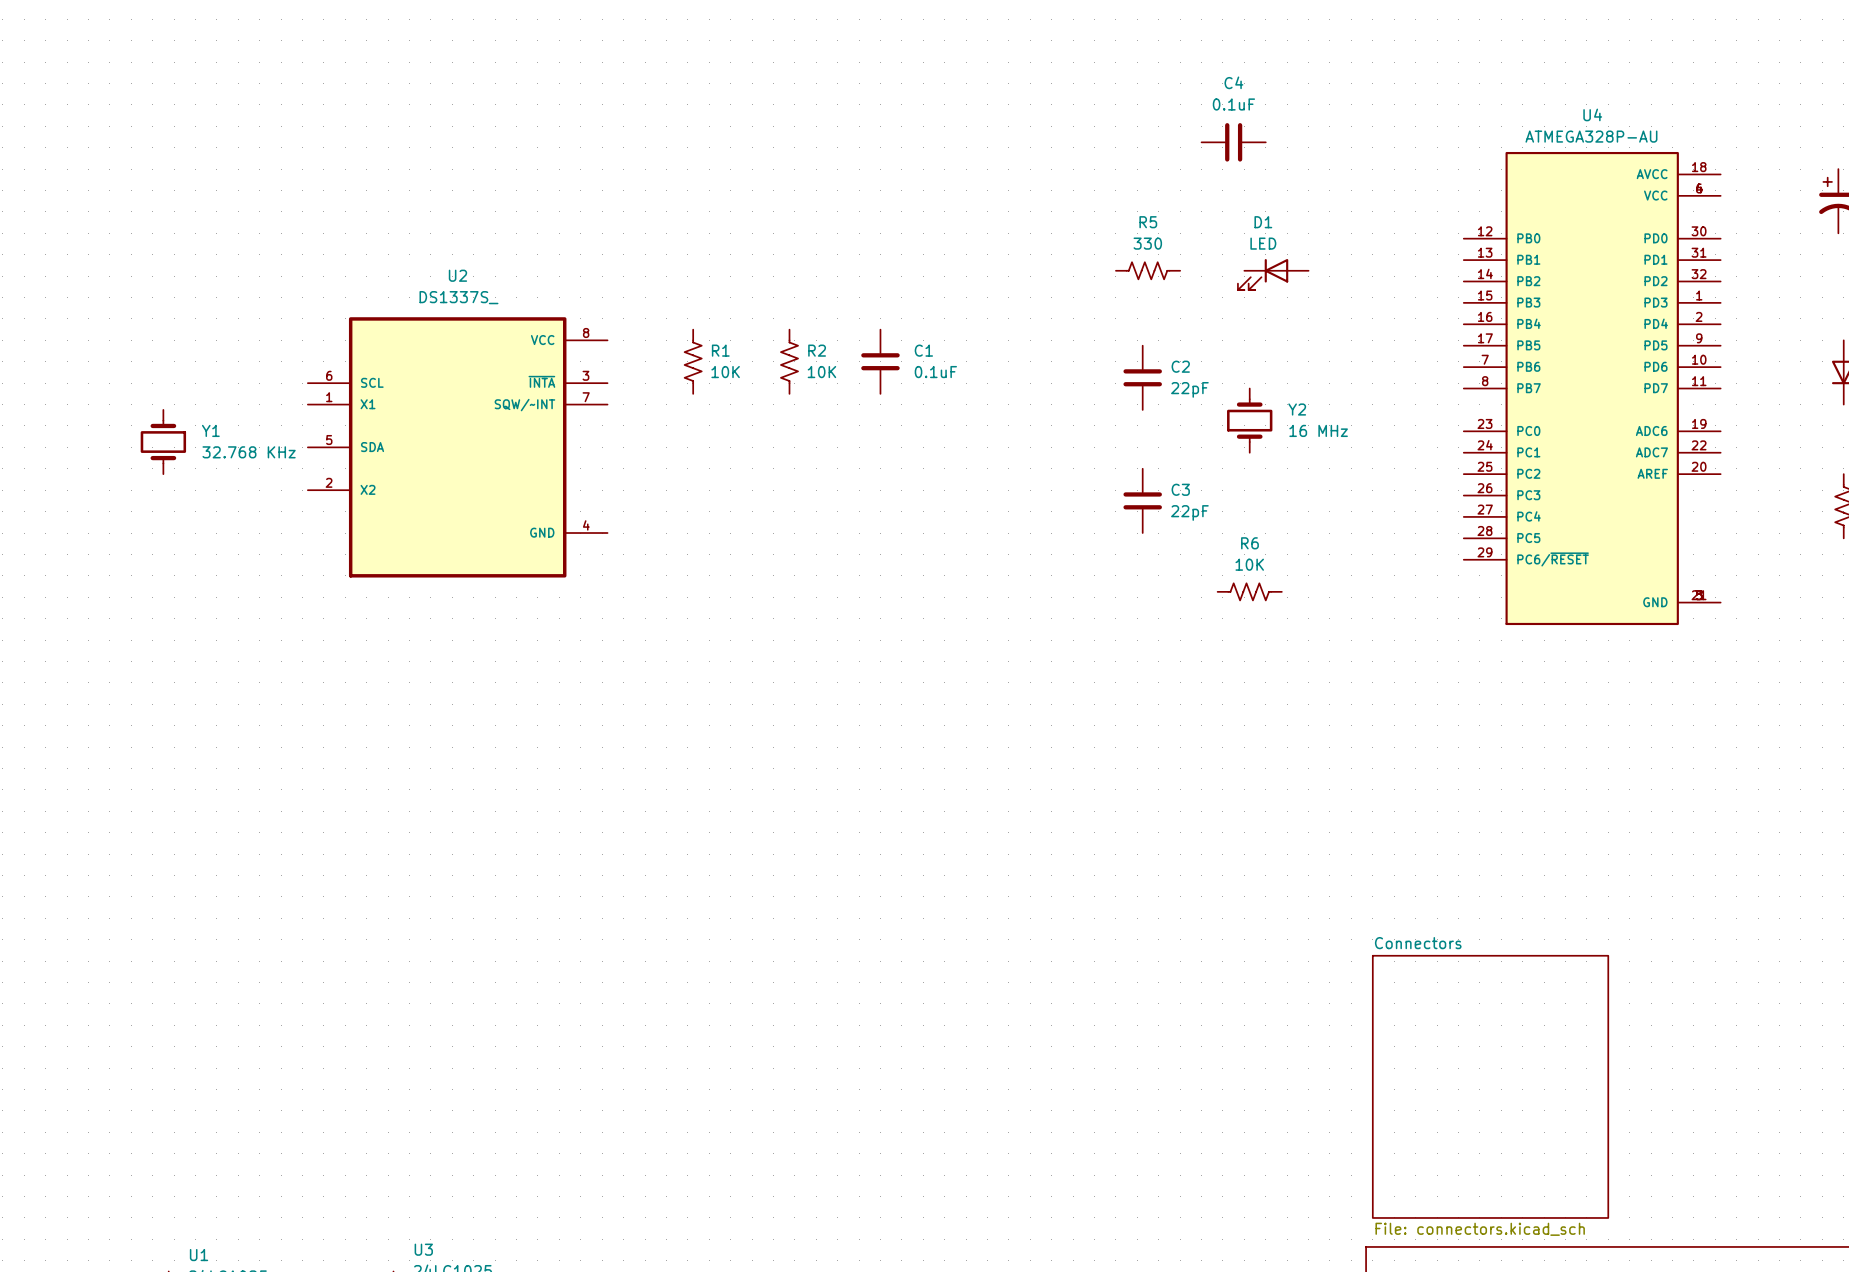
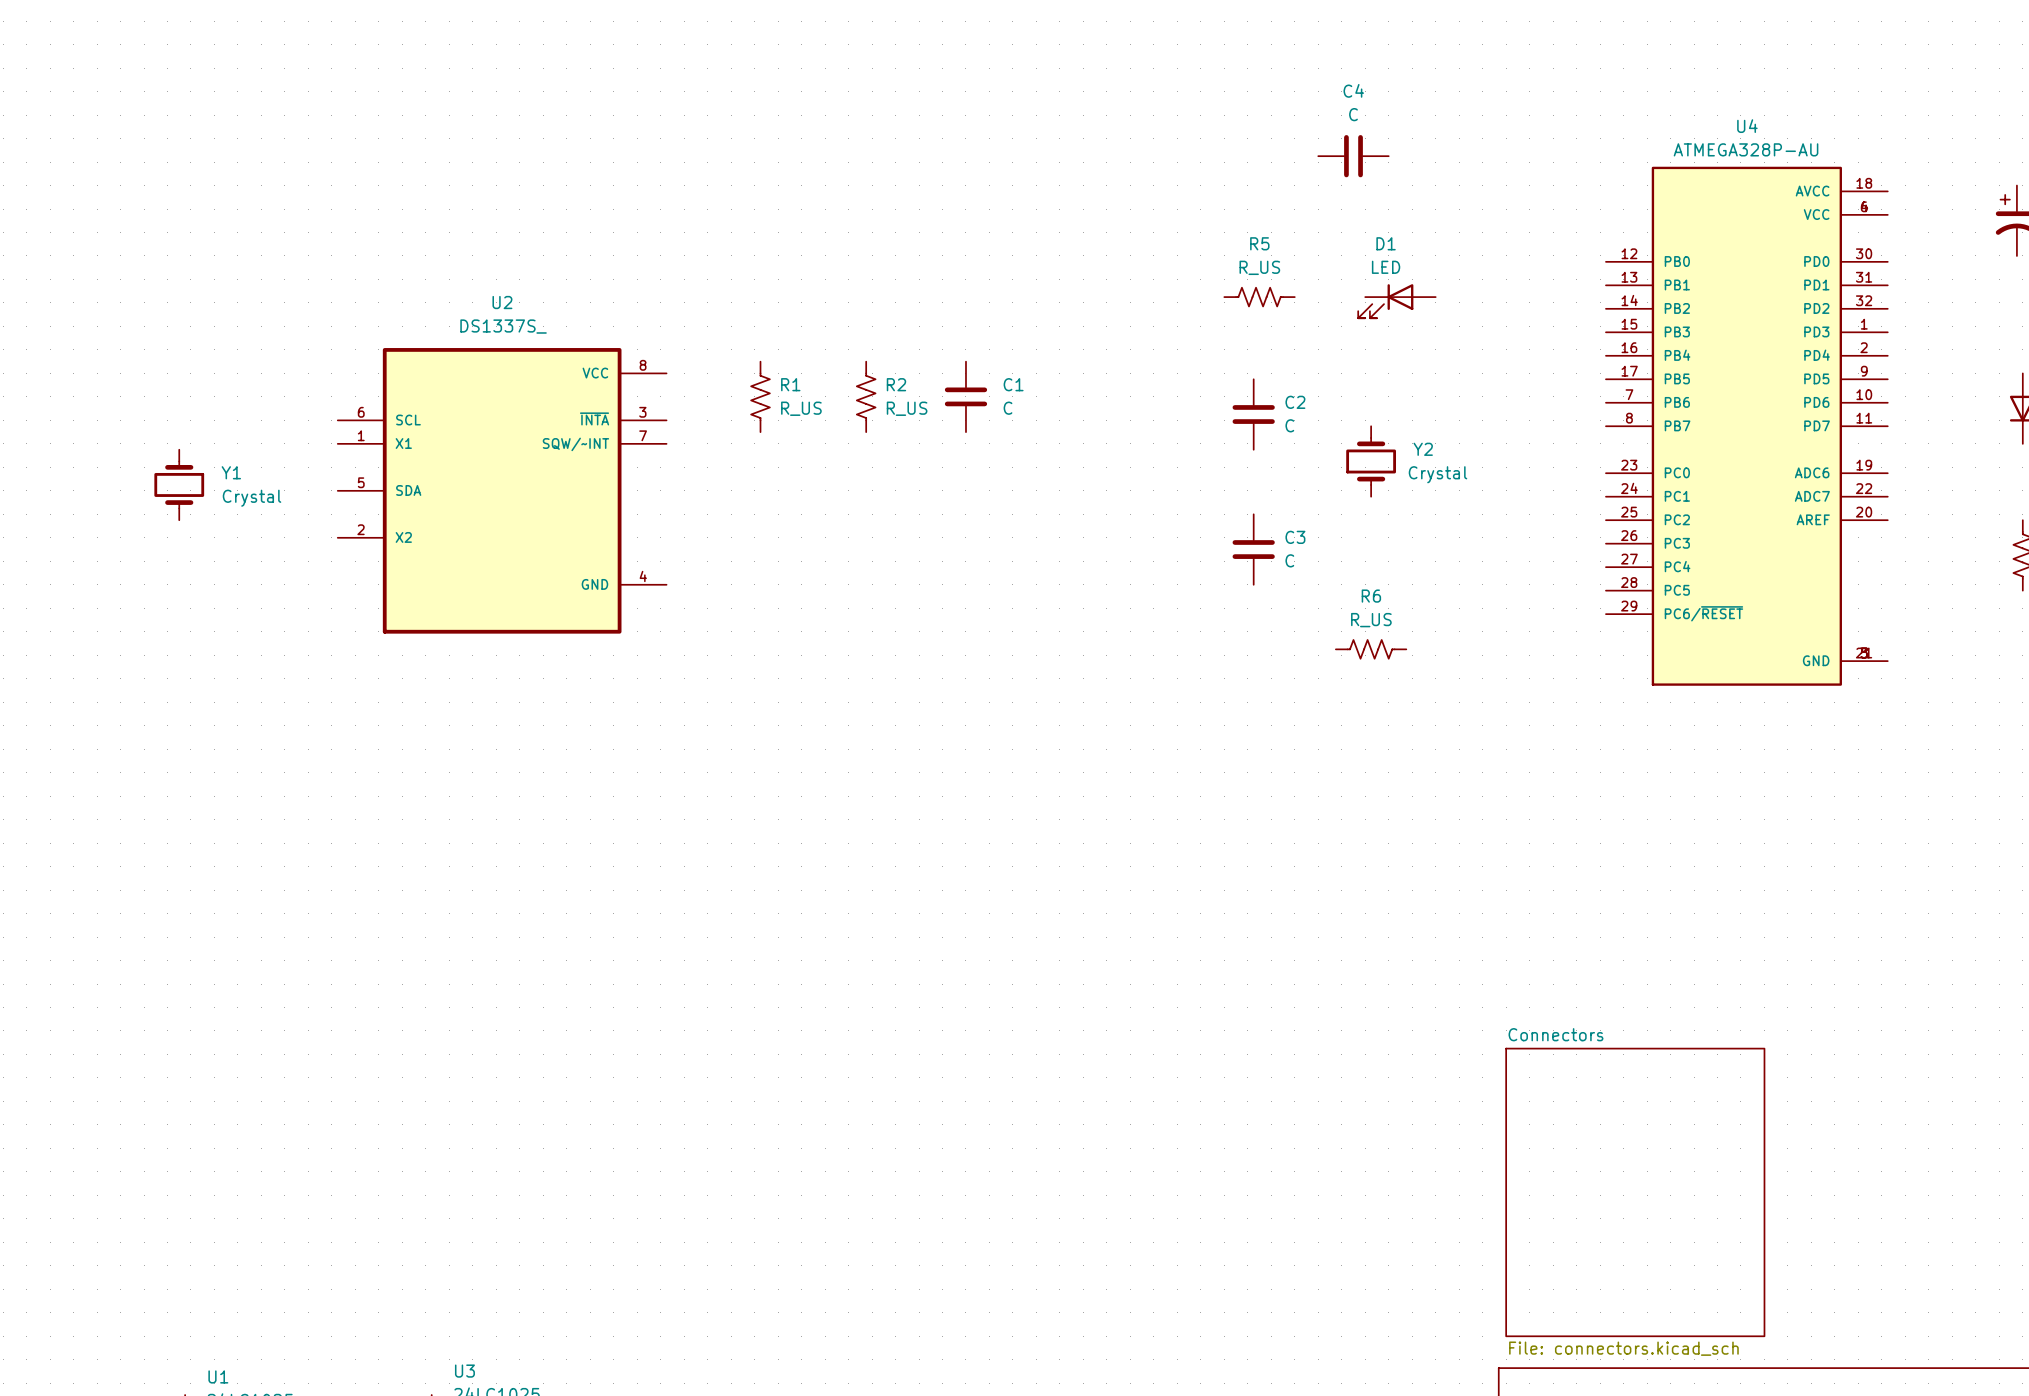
C4 value: 0.1uF (1233, 104) -> C (1353, 114)
R5 value: 330 (1147, 243) -> R_US (1259, 267)
R1 value: 10K (725, 372) -> R_US (801, 408)
R2 value: 10K (821, 372) -> R_US (907, 408)
C1 value: 0.1uF (935, 372) -> C (1008, 408)
C2 value: 22pF (1189, 389) -> C (1289, 425)
Y2 value: 16 MHz (1318, 430) -> Crystal (1438, 474)
Y1 value: 32.768 KHz (249, 452) -> Crystal (252, 498)
C3 value: 22pF (1189, 512) -> C (1289, 560)
R6 value: 10K (1249, 564) -> R_US (1371, 620)

